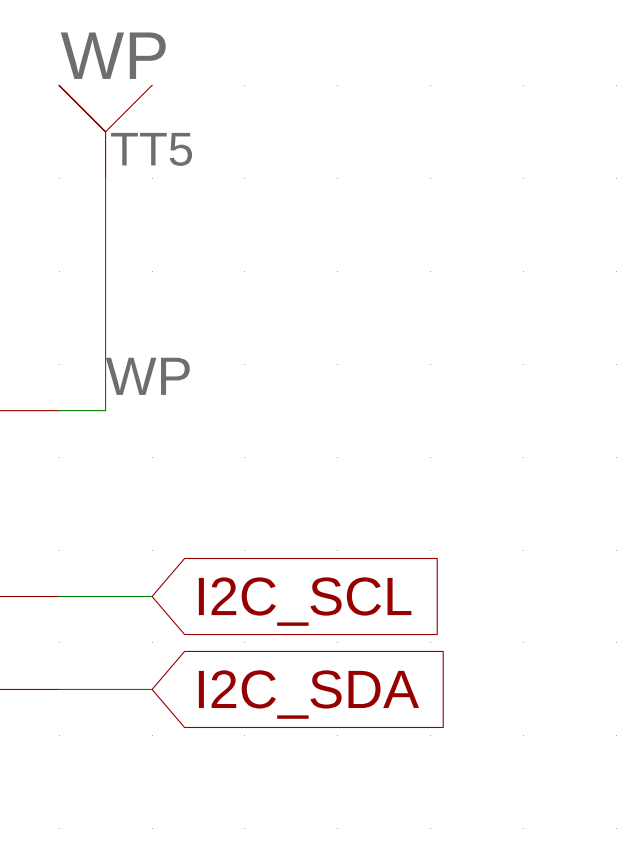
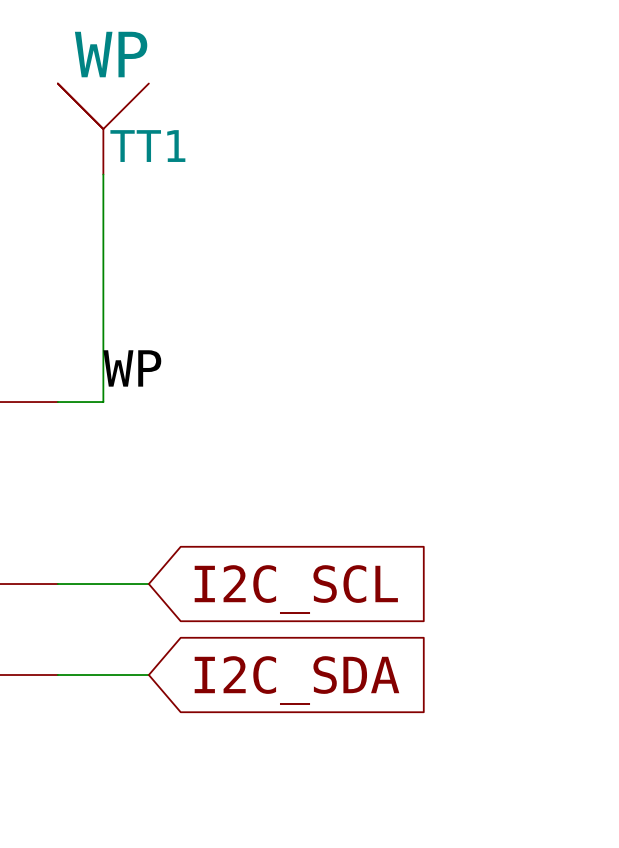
TT5 name: TT5 (151, 149) -> TT1 (147, 146)

